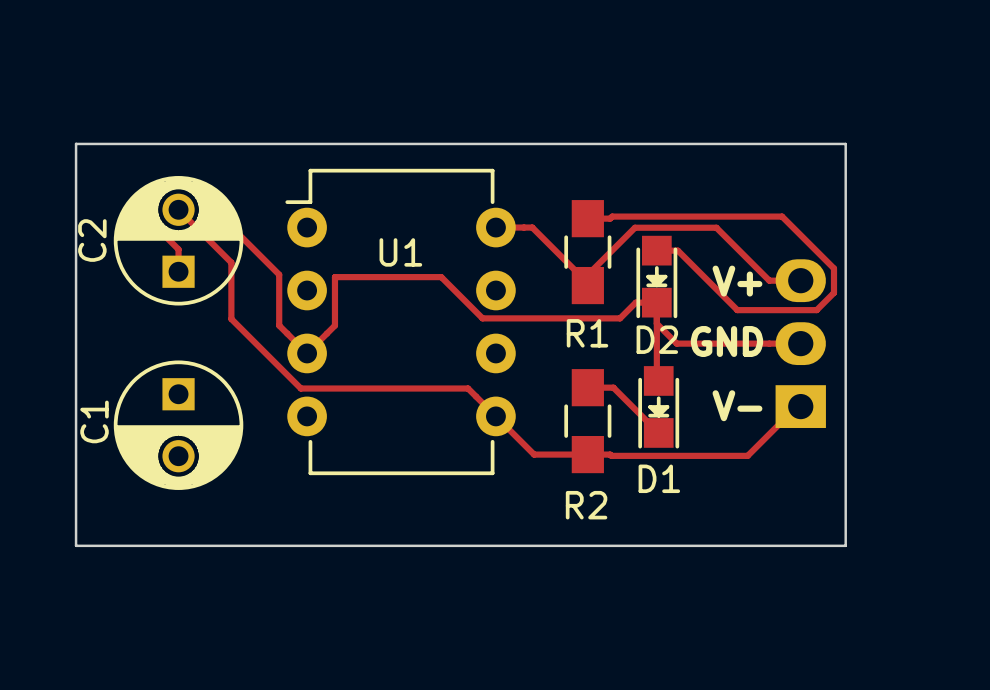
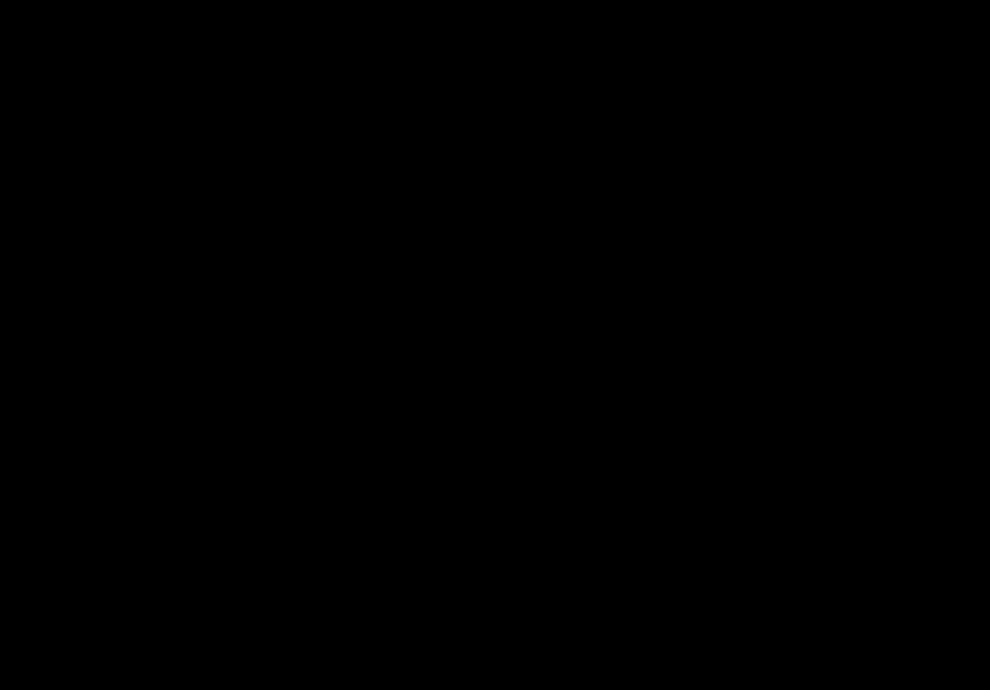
board edge: (76, 143) (76, 545) (845, 545) (845, 143) (76, 143) -> none
track: (178, 209) (231, 262) (231, 319) (300, 388) (468, 388) (534, 454) (747, 455) (796, 406) (800, 406) -> none
track: (587, 218) (610, 218) (612, 216) (782, 216) (833, 268) (833, 292) (816, 310) (737, 310) (677, 250) (656, 250) -> none
track: (495, 227) (532, 227) (587, 283) -> none
C2: (178, 240) -> none
R1: (587, 252) -> none
track: (178, 271) (178, 249) (154, 225) (154, 198) (166, 185) (190, 185) (279, 274) (279, 325) (307, 353) (334, 325) (334, 277) (441, 277) (482, 318) (620, 318) (635, 302) (656, 302) (656, 379) (658, 380) -> none
D2: (656, 276) -> none
track: (800, 280) (769, 280) (716, 227) (634, 227) (587, 274) (587, 285) -> none
text: V+ (737, 281) -> none
U1: (400, 321) -> none
track: (656, 323) (676, 343) (800, 343) -> none
text: GND (726, 341) -> none
part: (800, 343) -> none
track: (587, 387) (613, 387) (658, 432) -> none
text: V- (737, 405) -> none
D1: (658, 407) -> none
R2: (587, 421) -> none
C1: (178, 425) -> none

